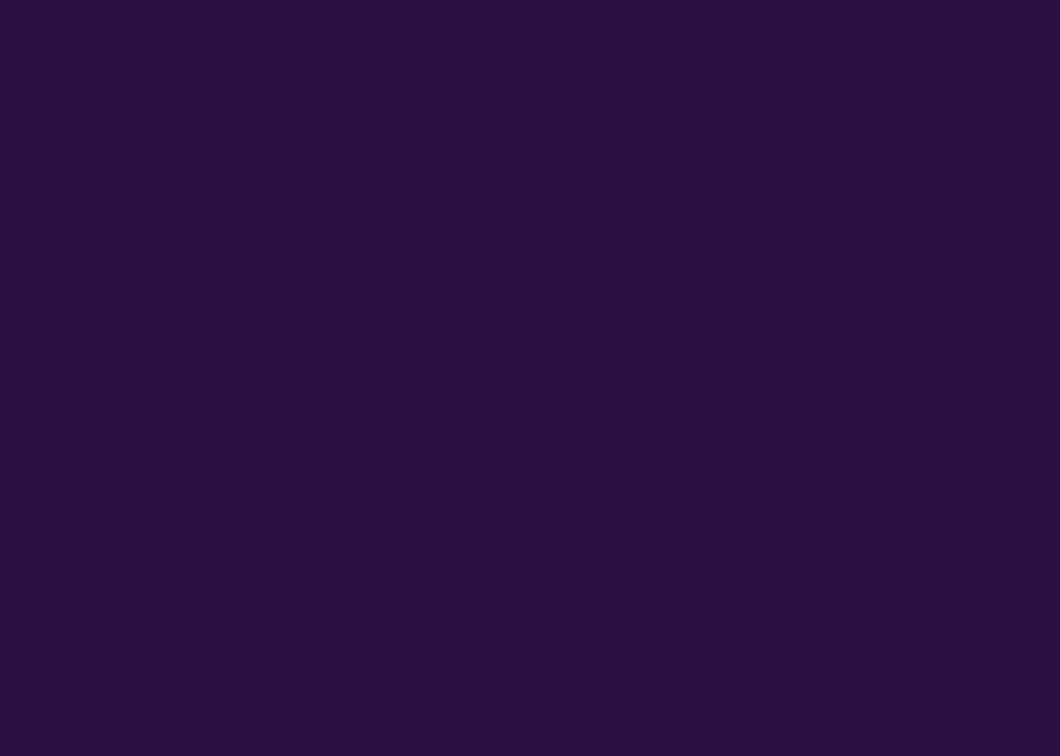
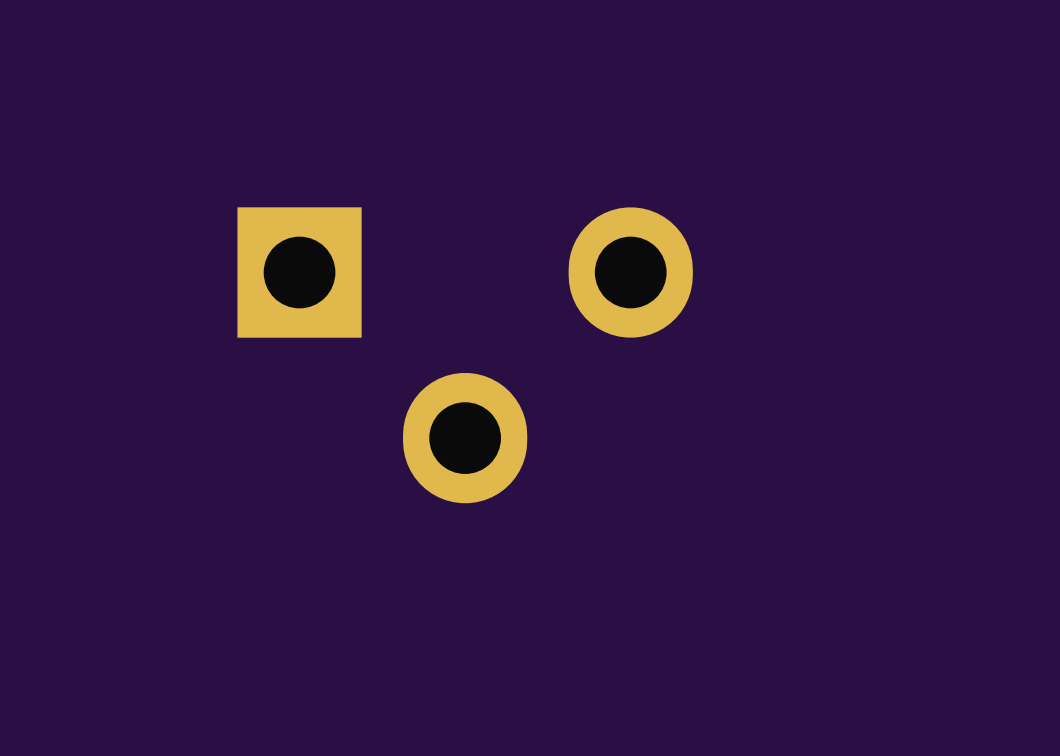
part: none -> (465, 355)

